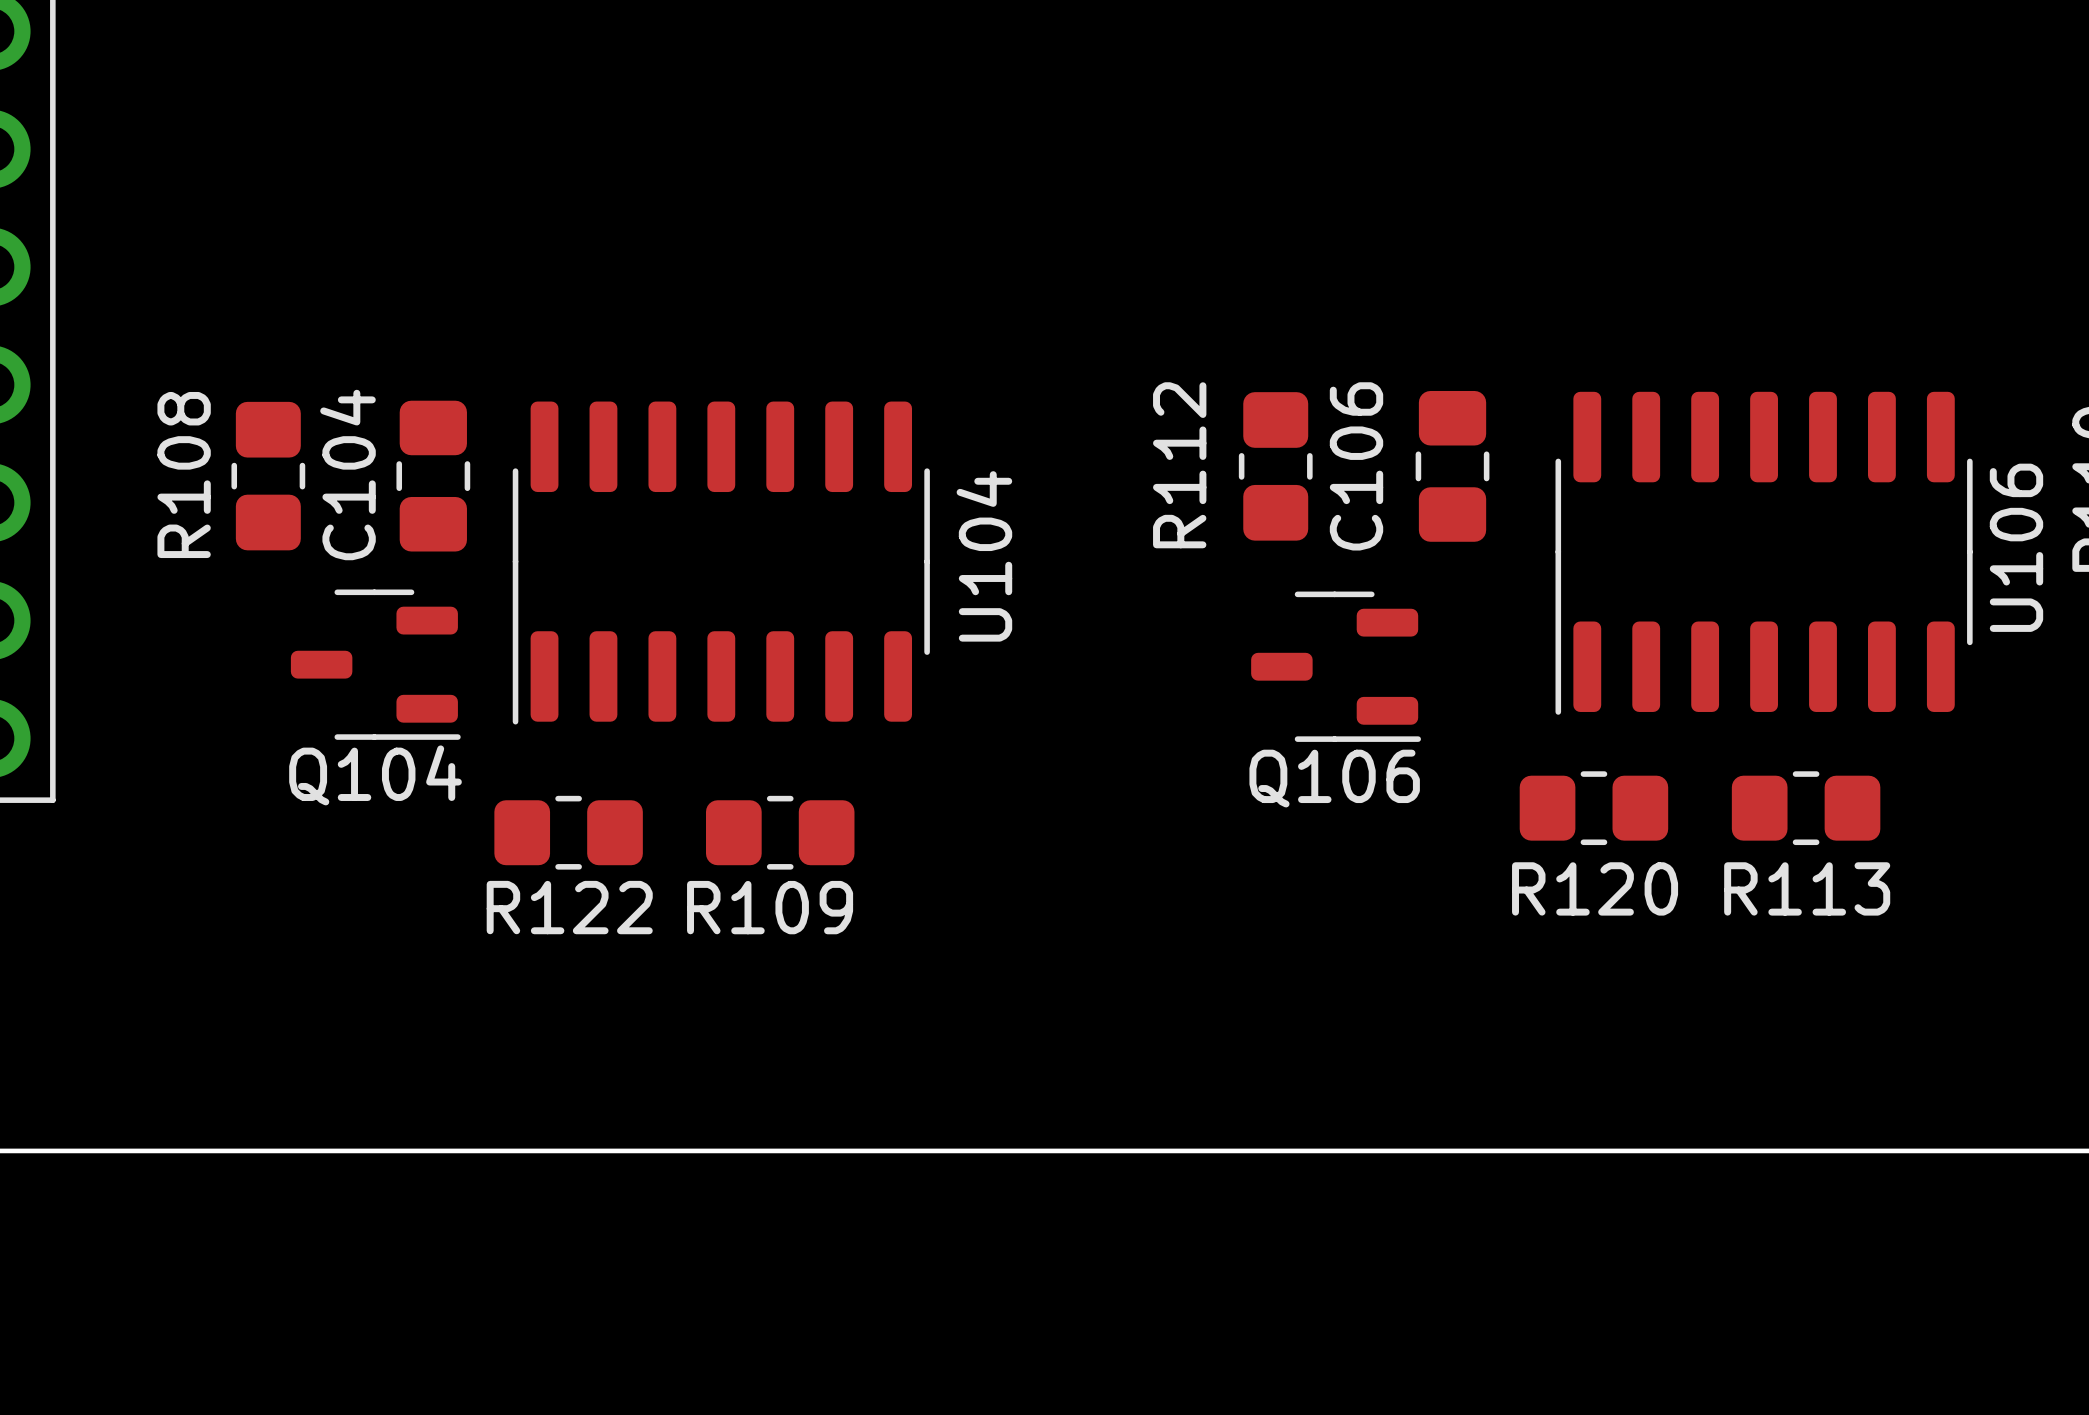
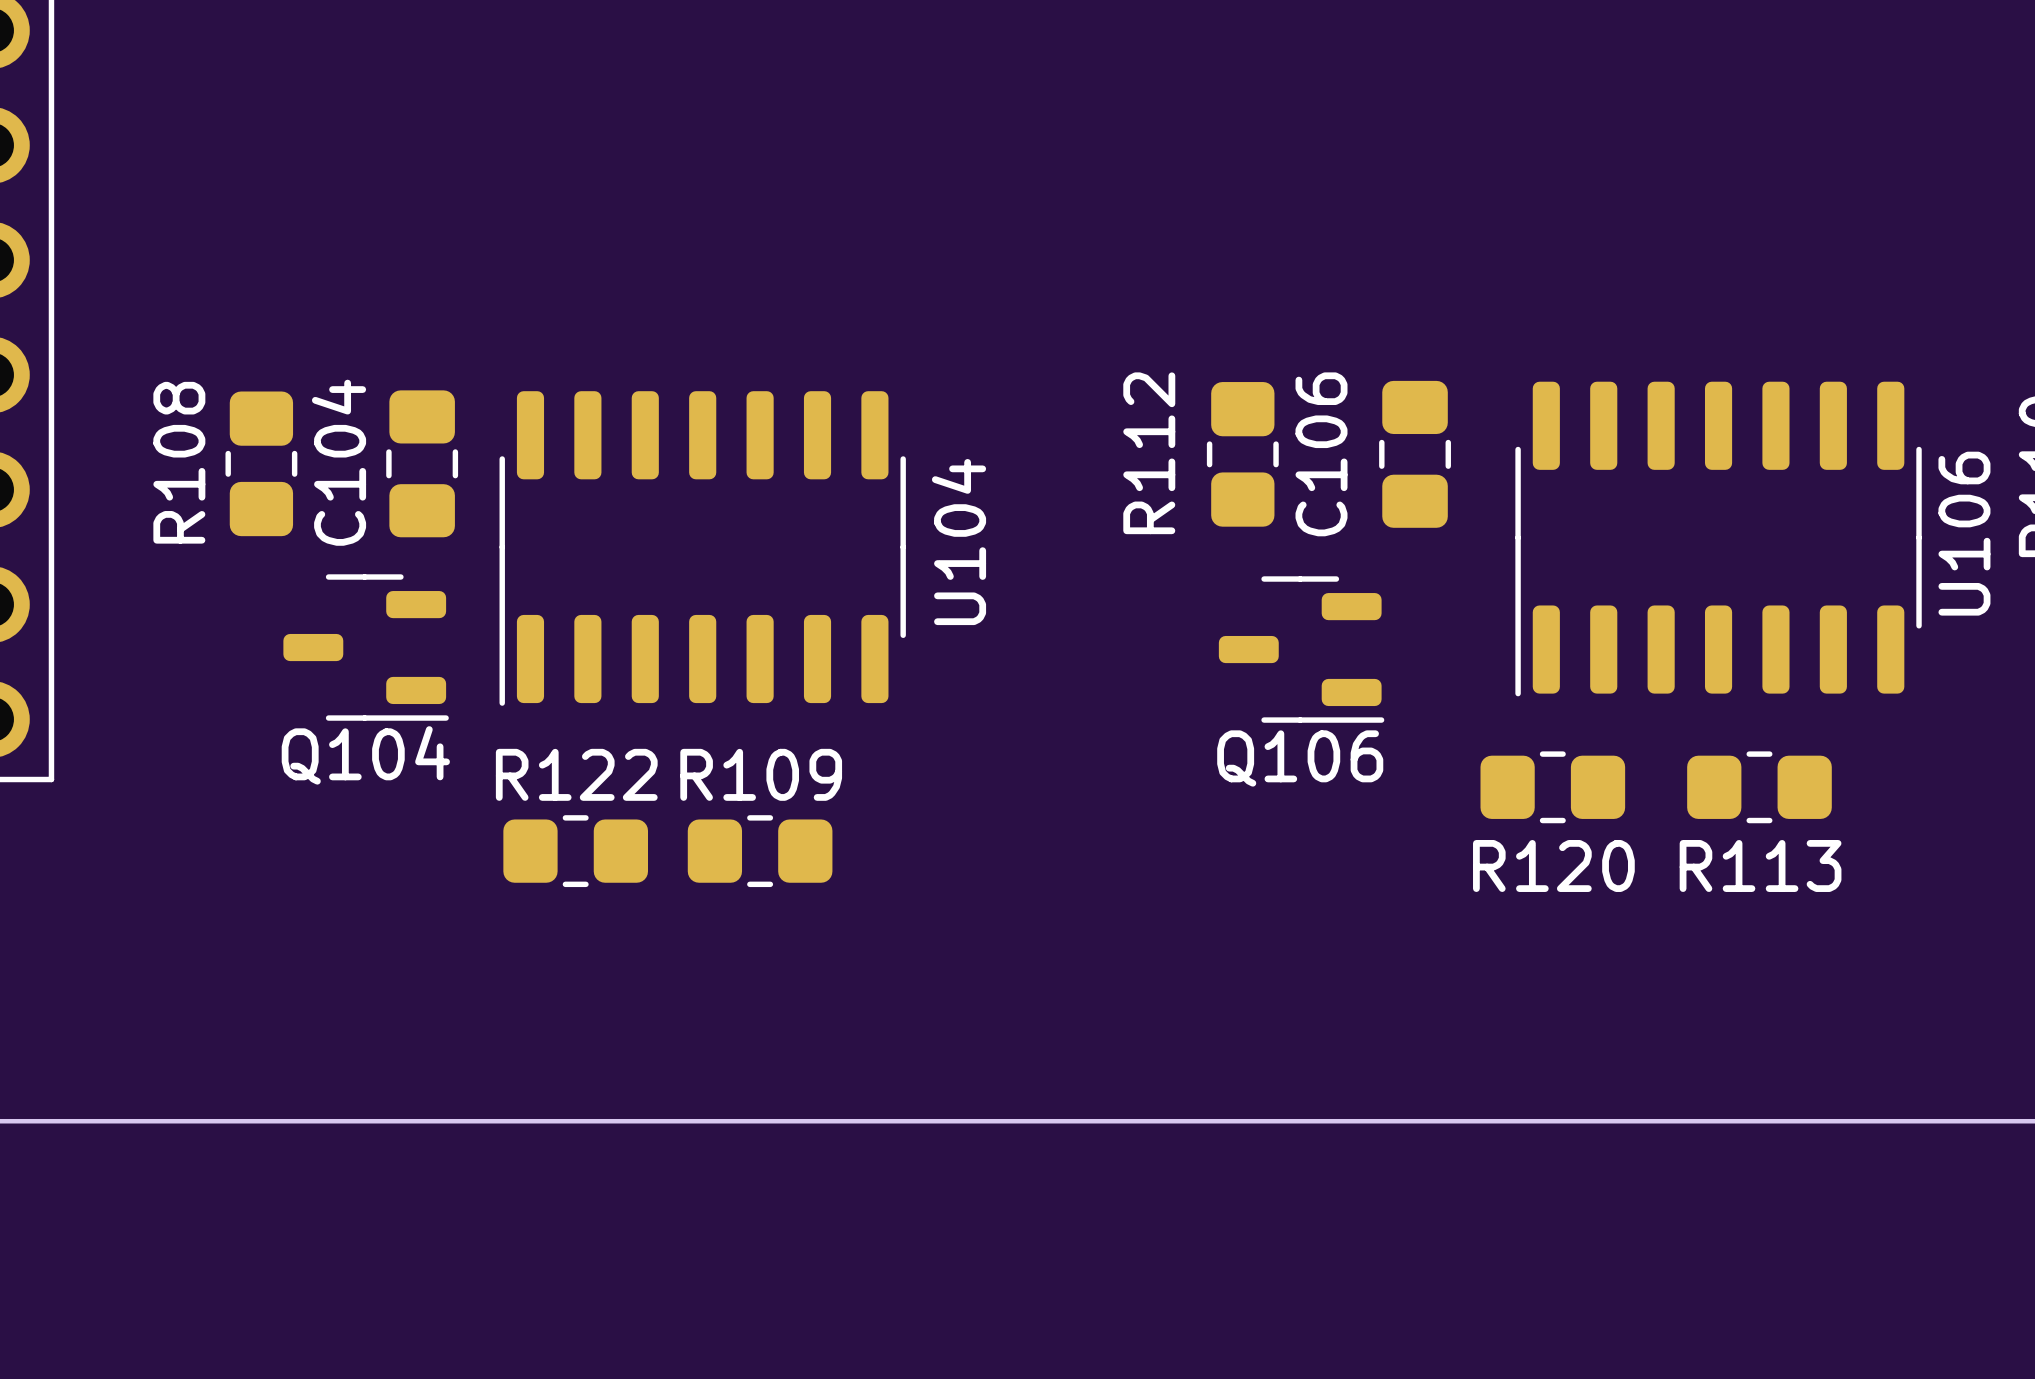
R122 position: (568, 832) -> (575, 851)
R109 position: (780, 832) -> (760, 851)
R122 name position: R122 (569, 907) -> R122 (576, 774)
R109 name position: R109 (770, 907) -> R109 (761, 774)

